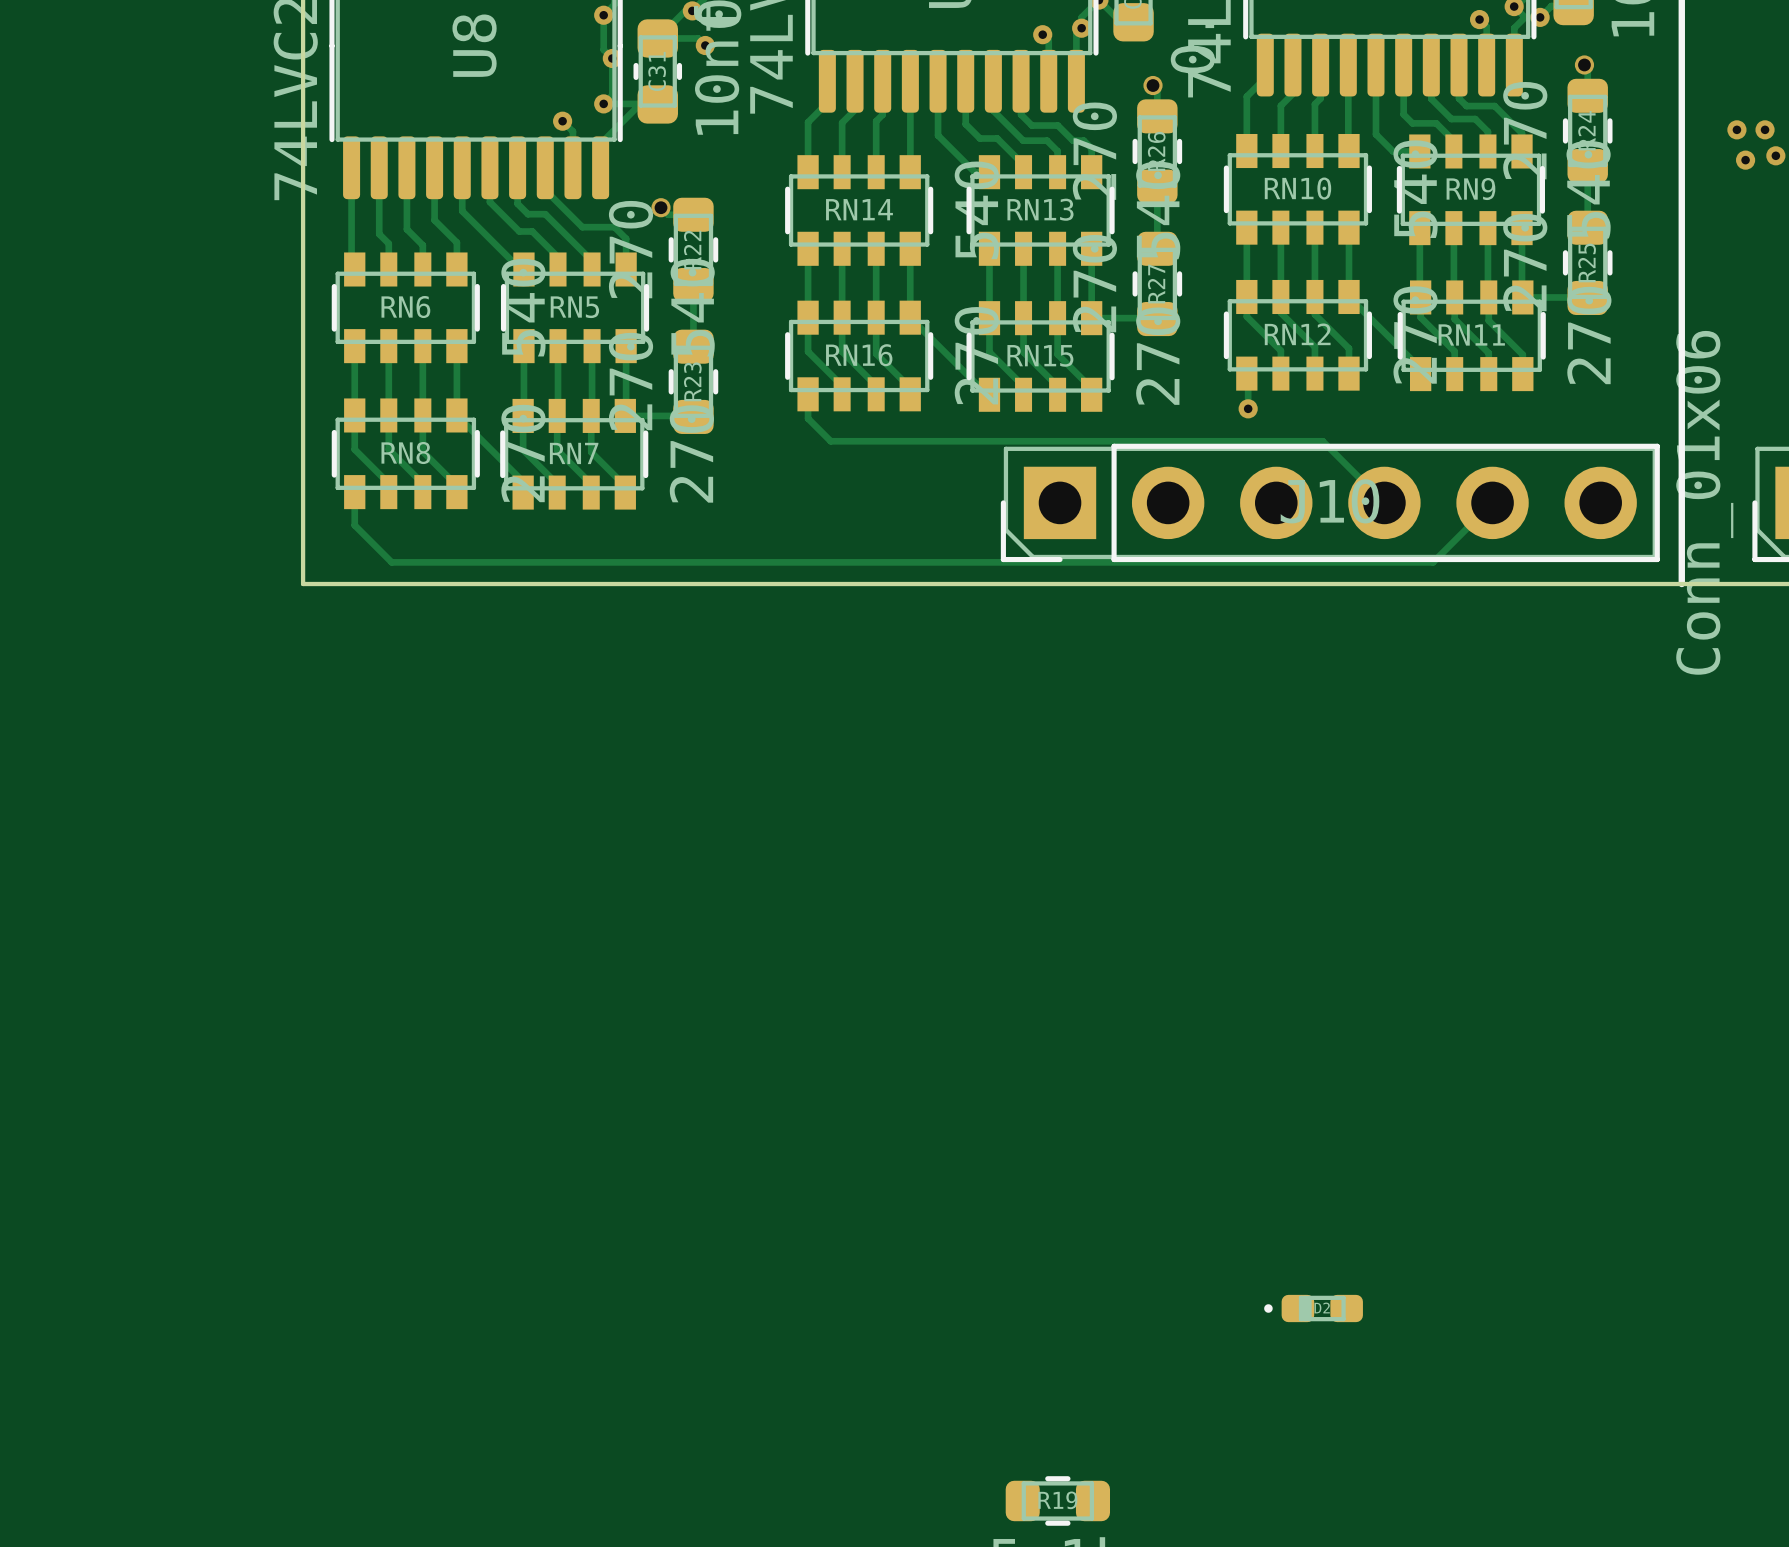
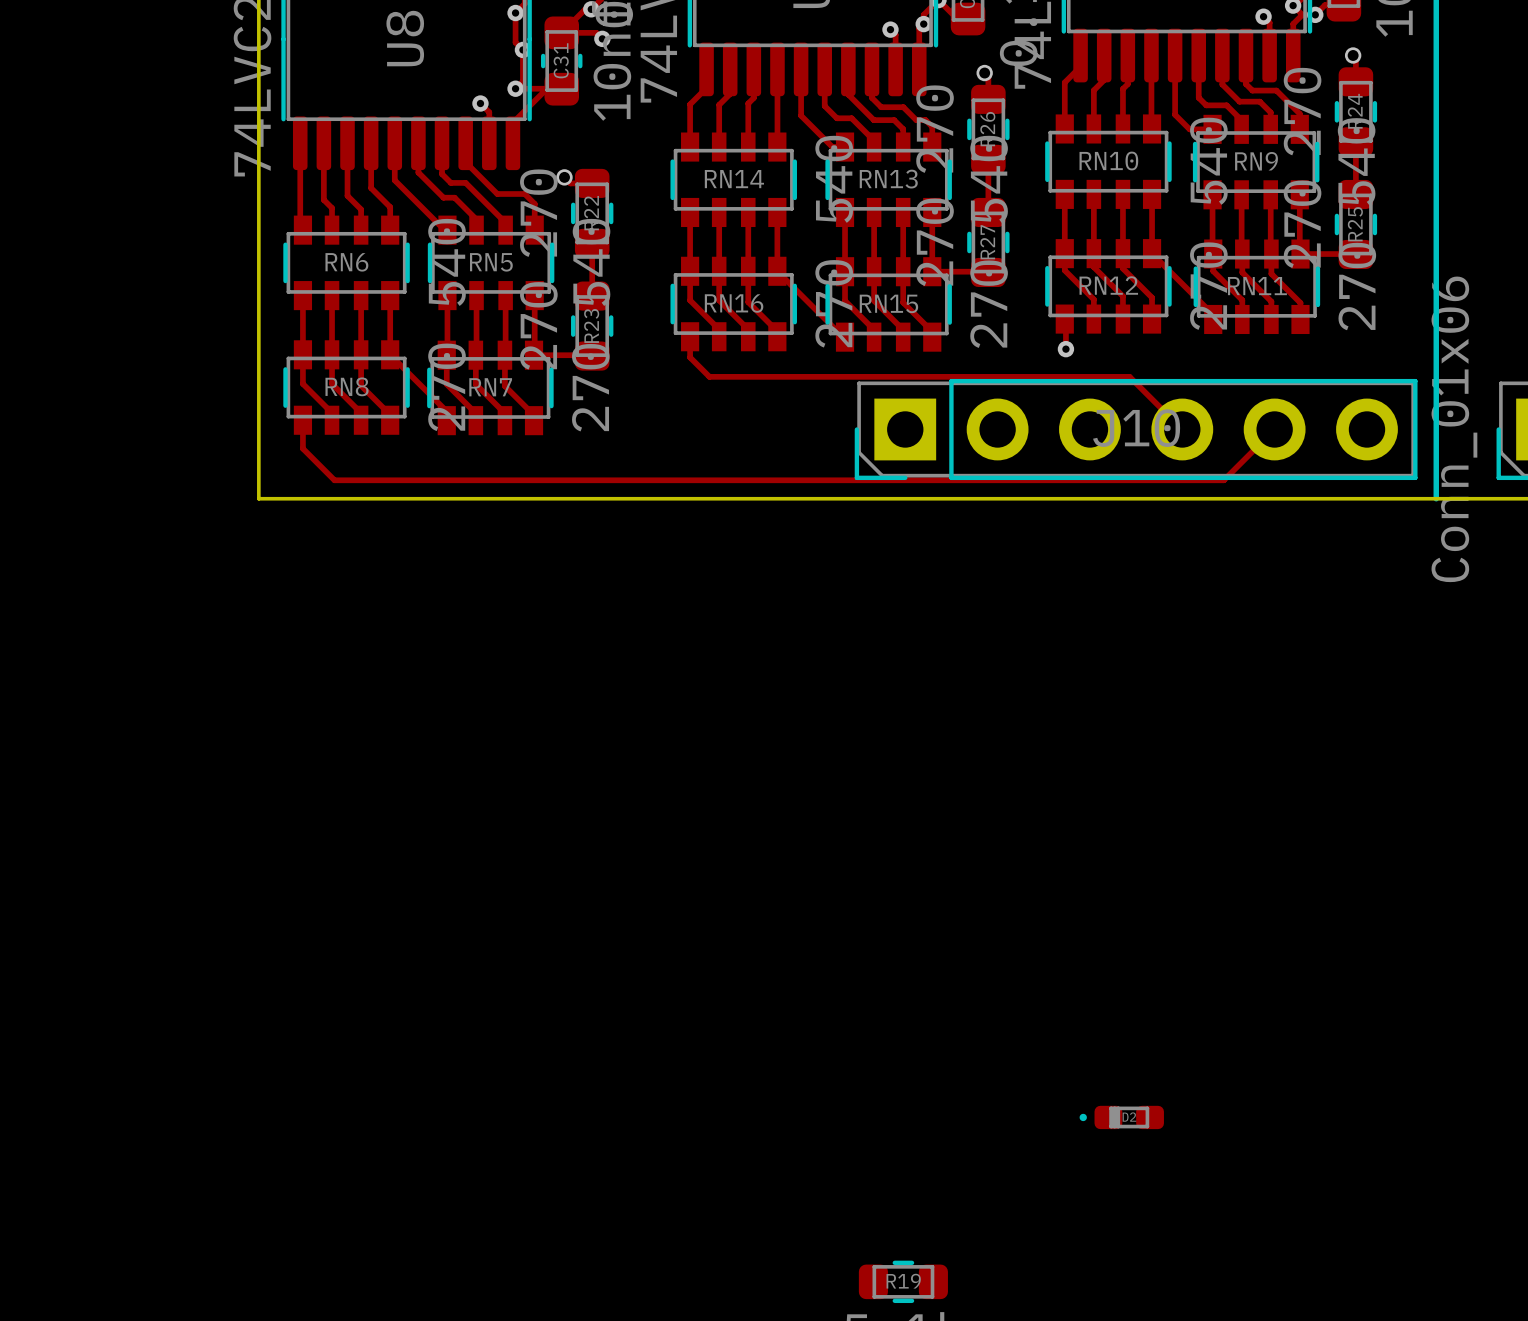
via: (1736, 129) -> none
via: (1765, 129) -> none
via: (1775, 155) -> none
via: (1745, 160) -> none

